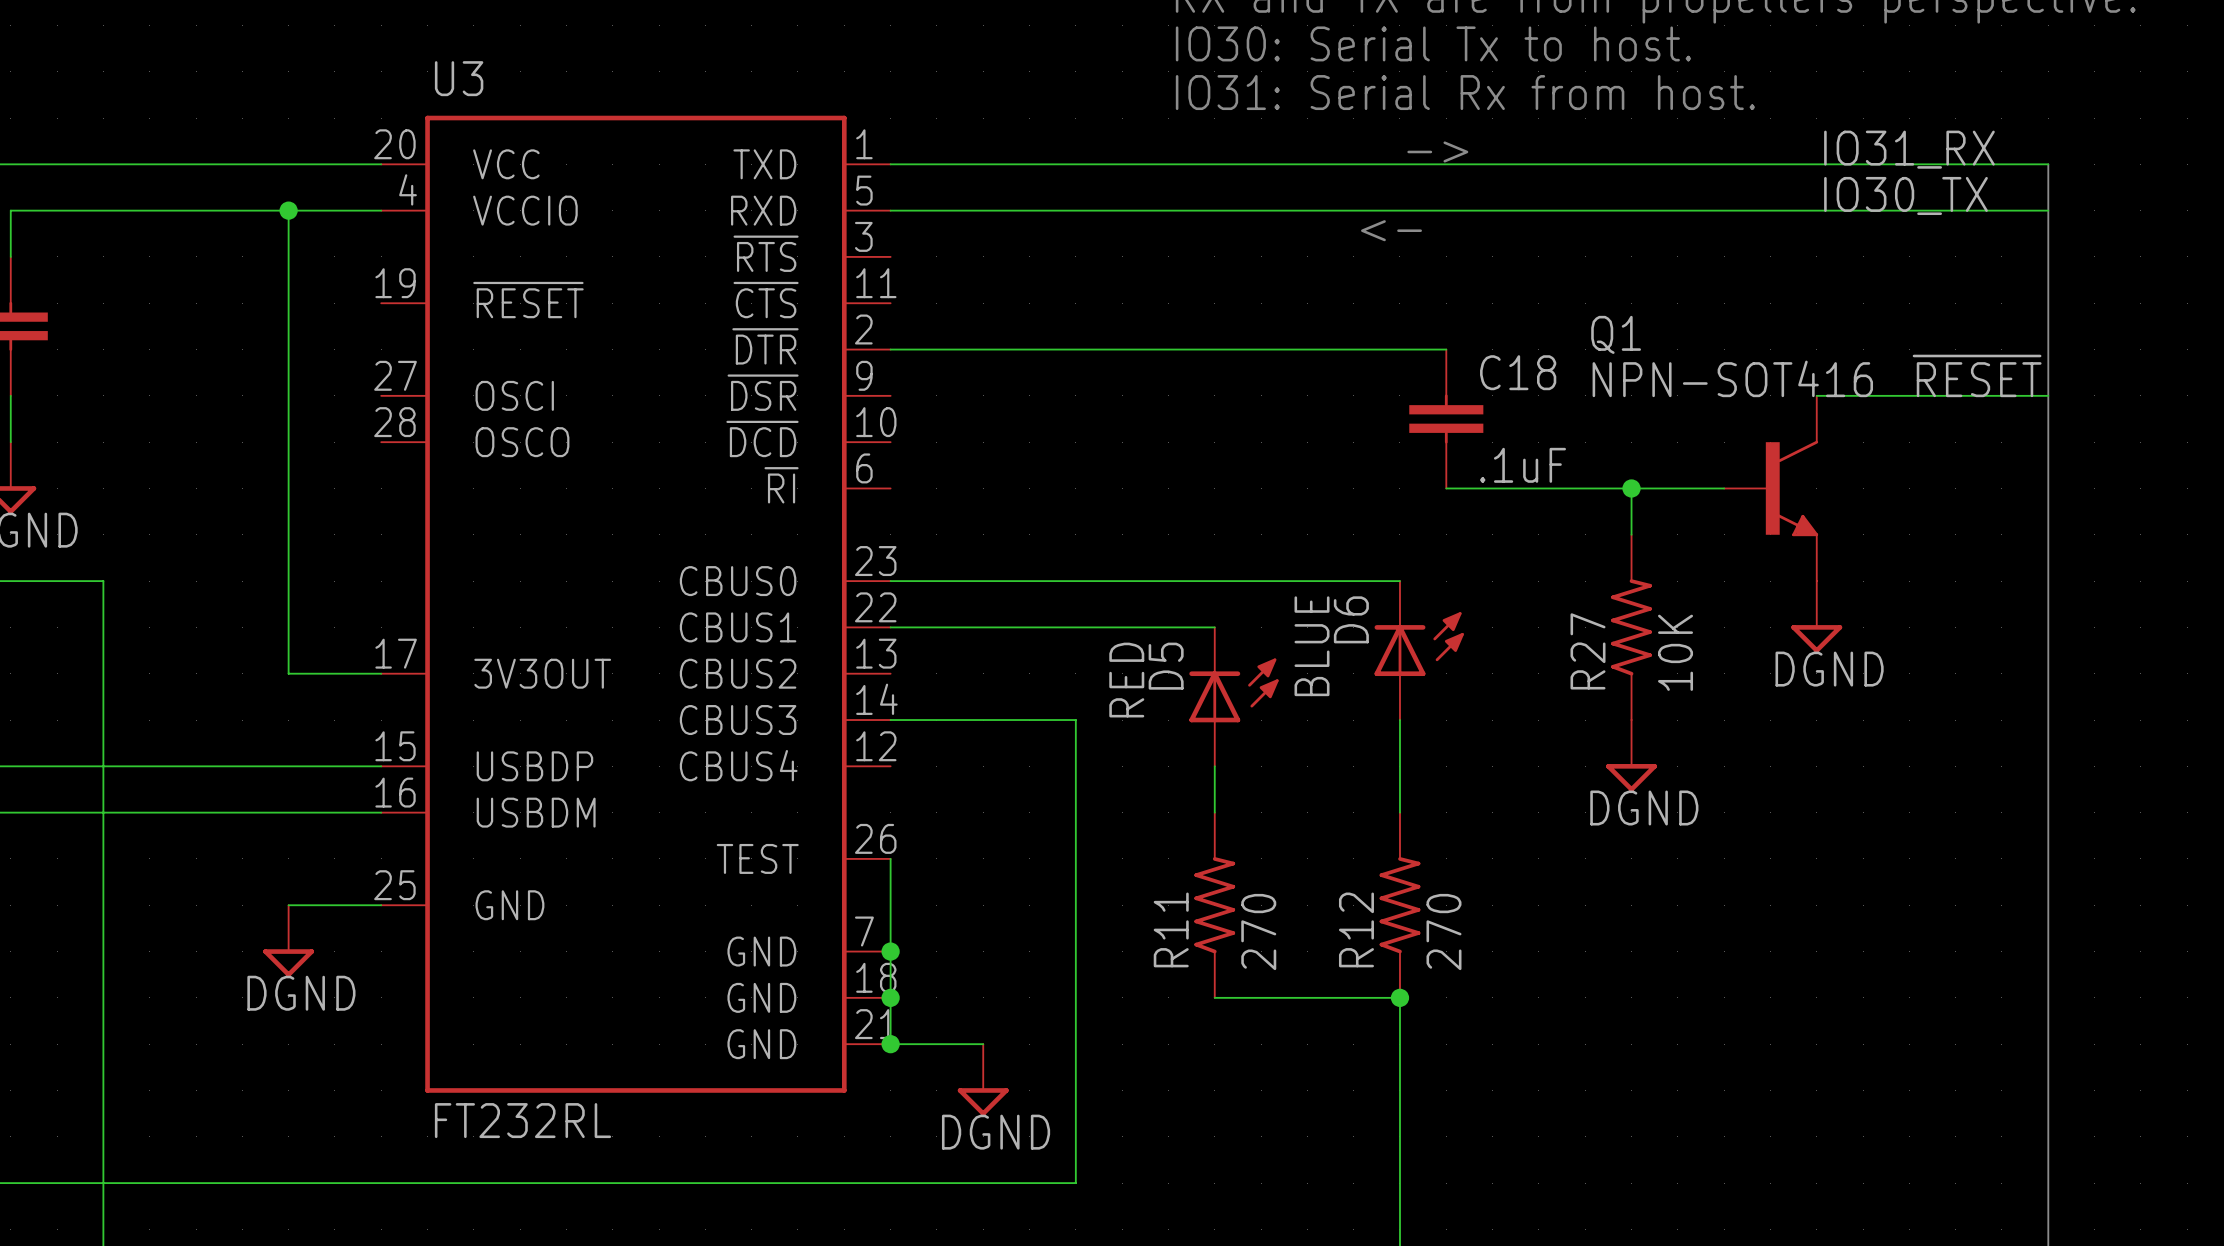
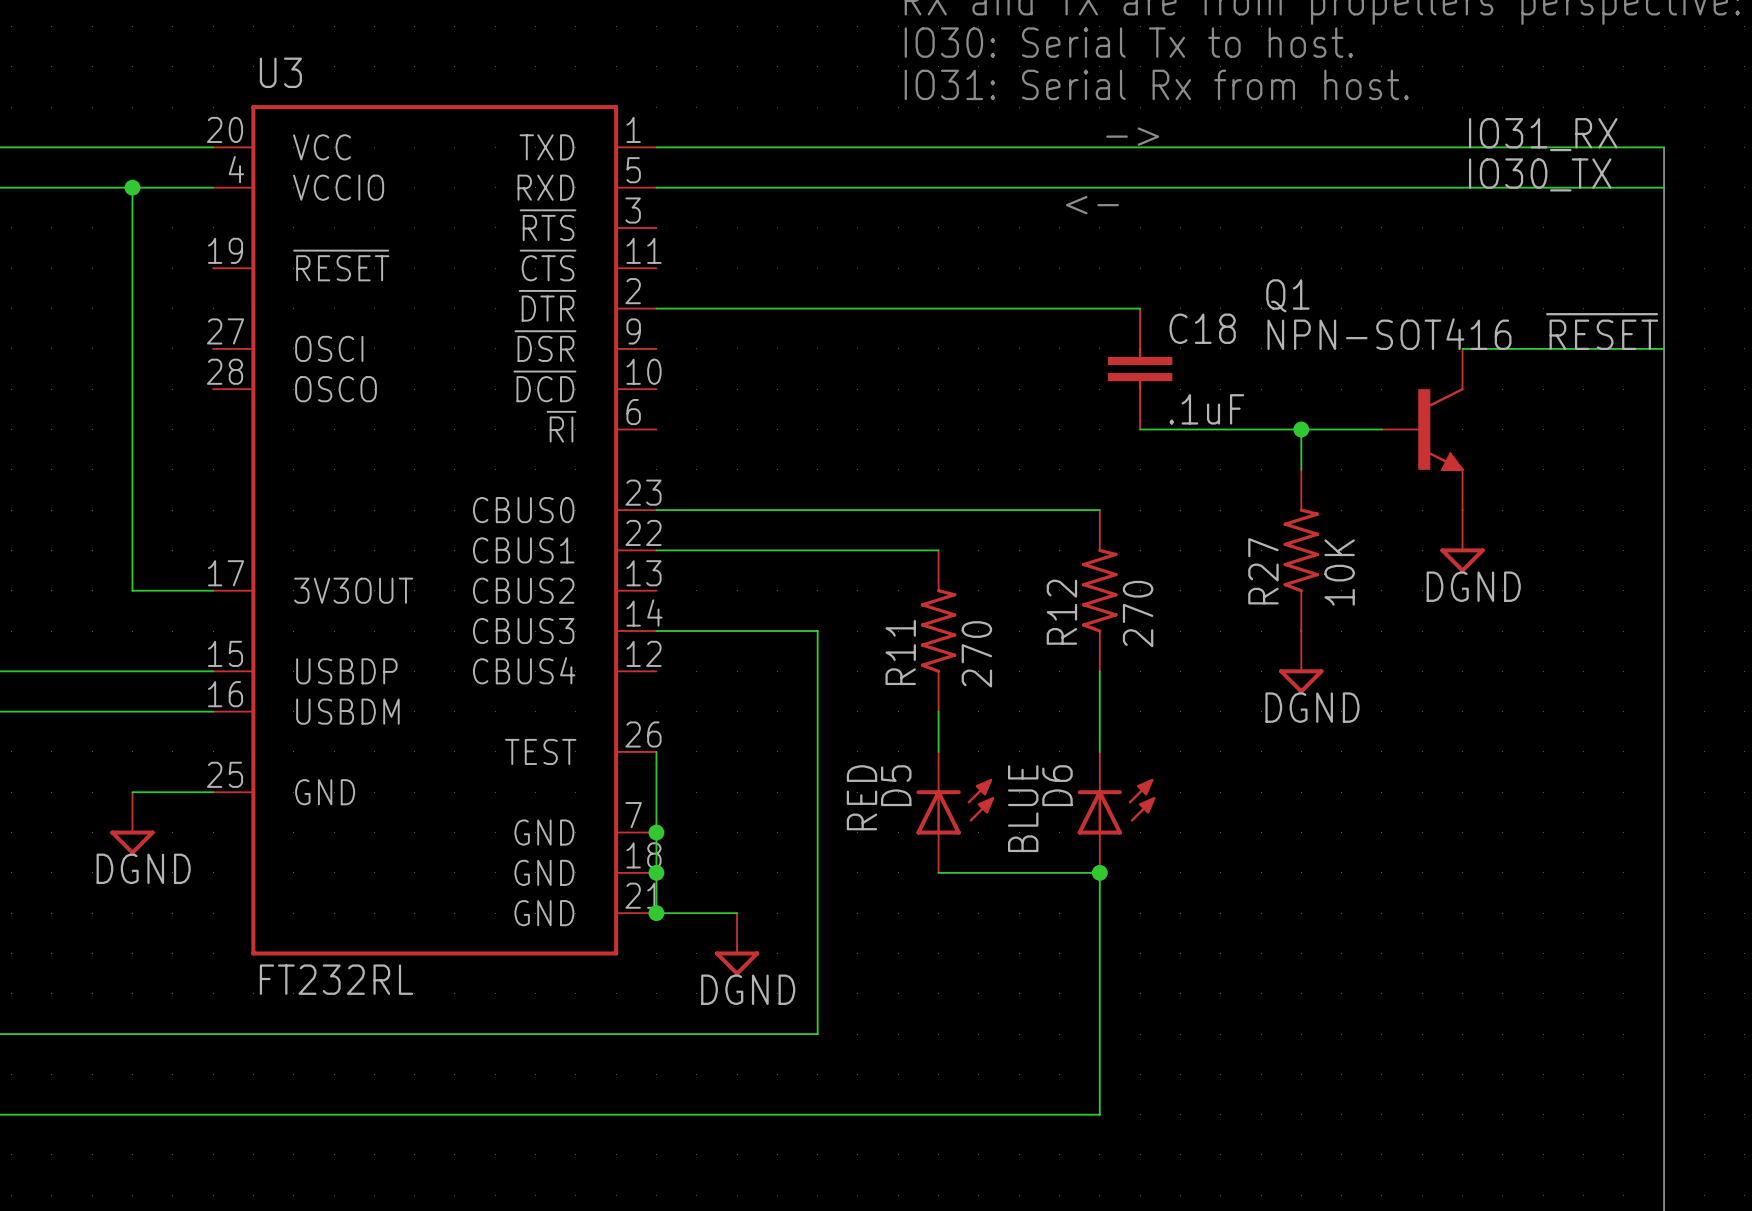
D6 position: (1419, 650) -> (1116, 812)
D5 position: (1233, 696) -> (955, 812)
R11 position: (1214, 905) -> (938, 631)
R12 position: (1399, 905) -> (1099, 590)

